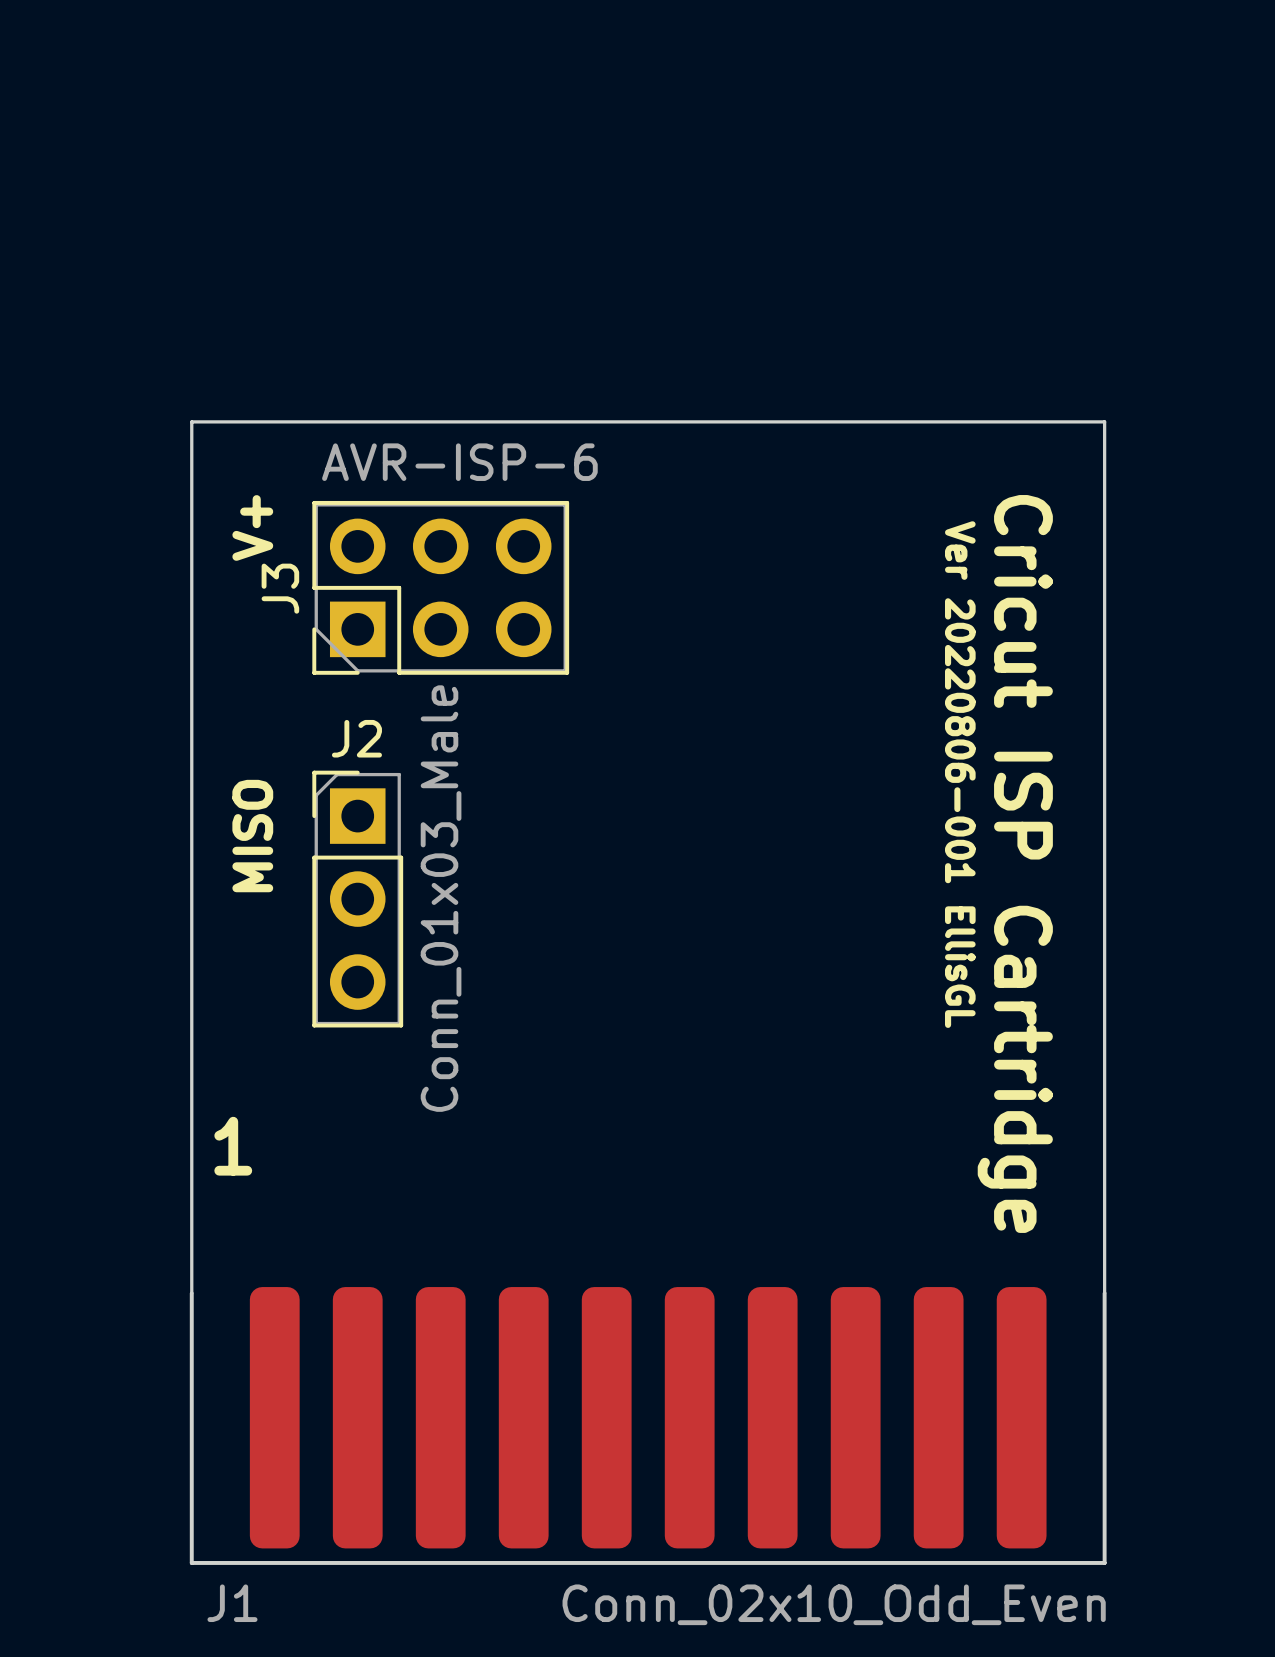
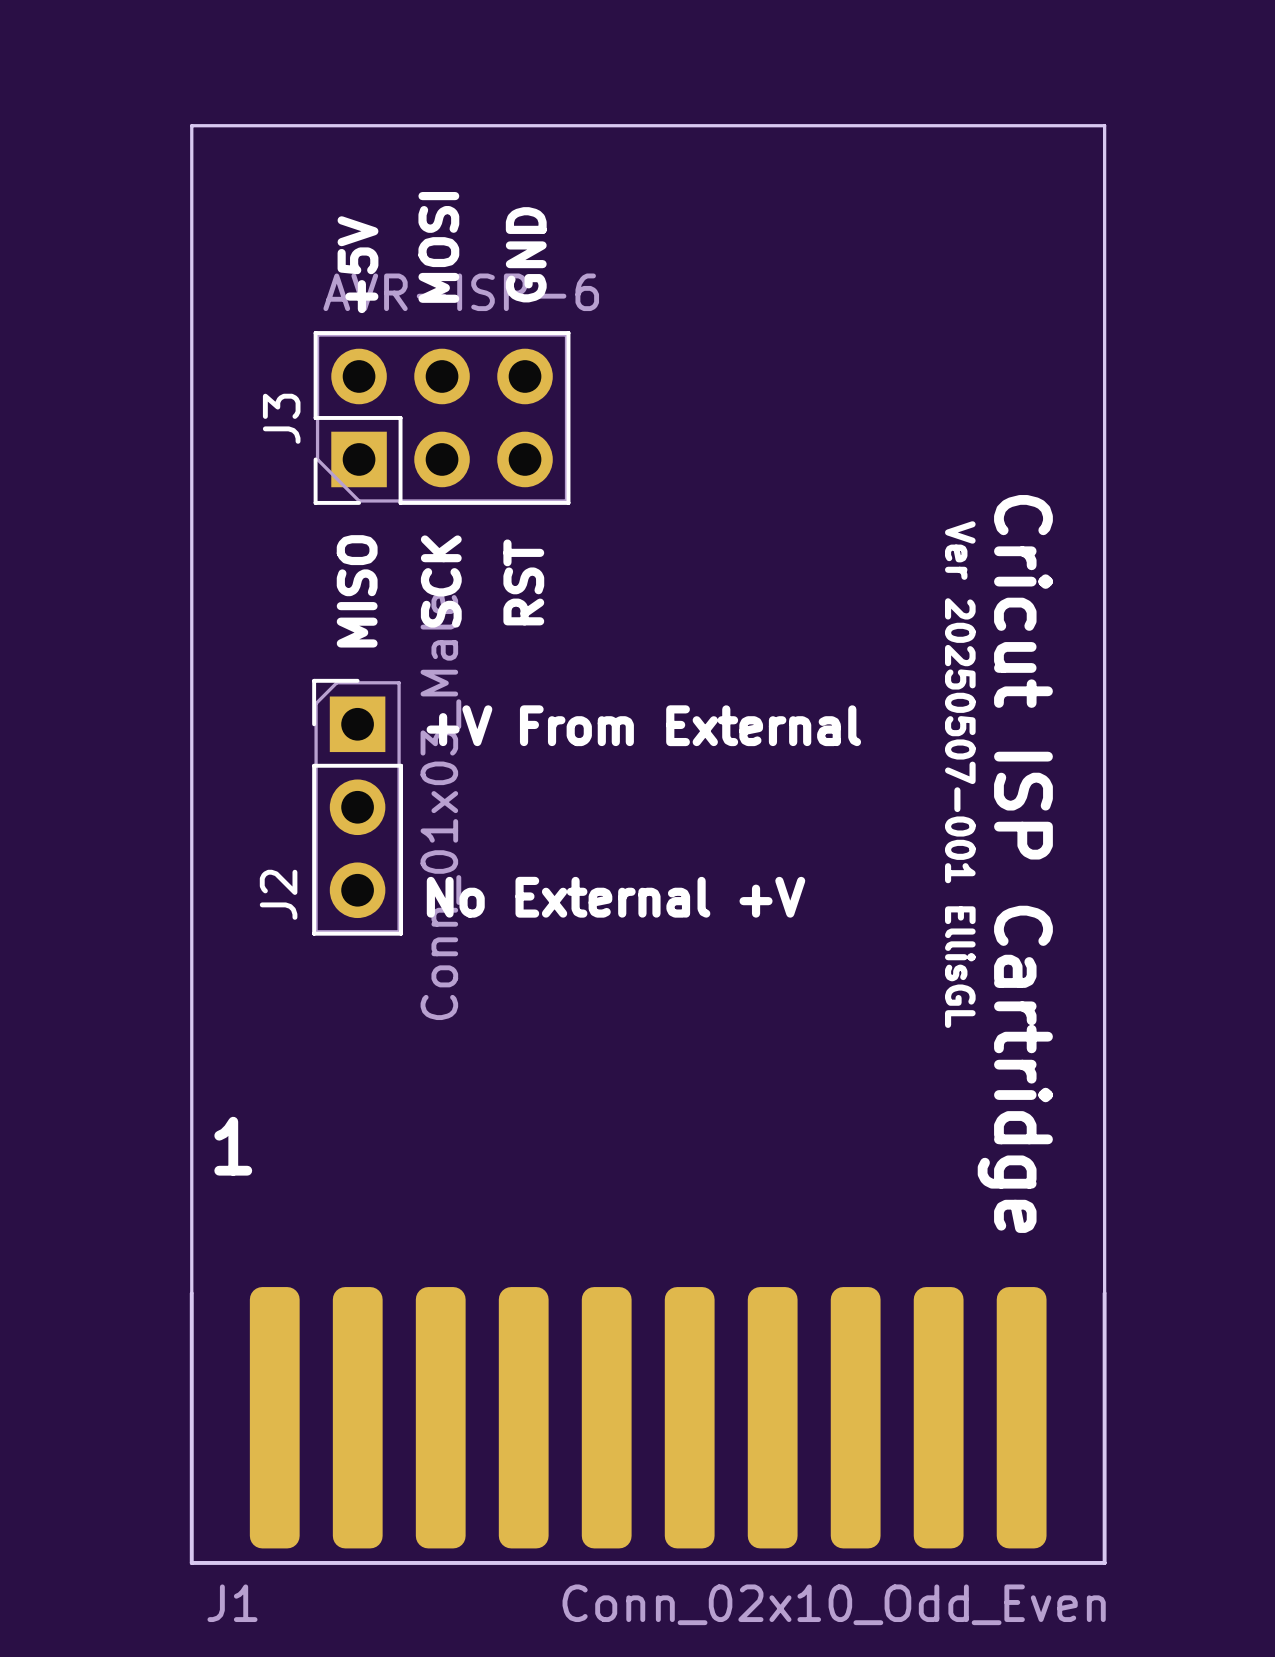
text: none -> MOSI (438, 247)
text: none -> GND (526, 254)
text: none -> +5V (357, 264)
board edge: (191, 421) (1104, 421) -> (191, 421) (191, 125) (1104, 125) (1104, 421)
text: V+ (252, 527) -> none
text: none -> SCK (441, 581)
text: none -> RST (523, 582)
J3 position: (440, 587) -> (442, 417)
text: none -> +V From External (643, 725)
J2 name rotation: 0° (356, 738) -> 90° counterclockwise (278, 894)
J2 name position: J2 (356, 738) -> J2 (278, 894)
text: Ver 20220806-001 EllisGL (960, 774) -> Ver 20250507-001 EllisGL (960, 774)
text position: MISO (252, 836) -> MISO (357, 591)
text: none -> No External +V (616, 897)
J2 position: (357, 899) -> (357, 807)

